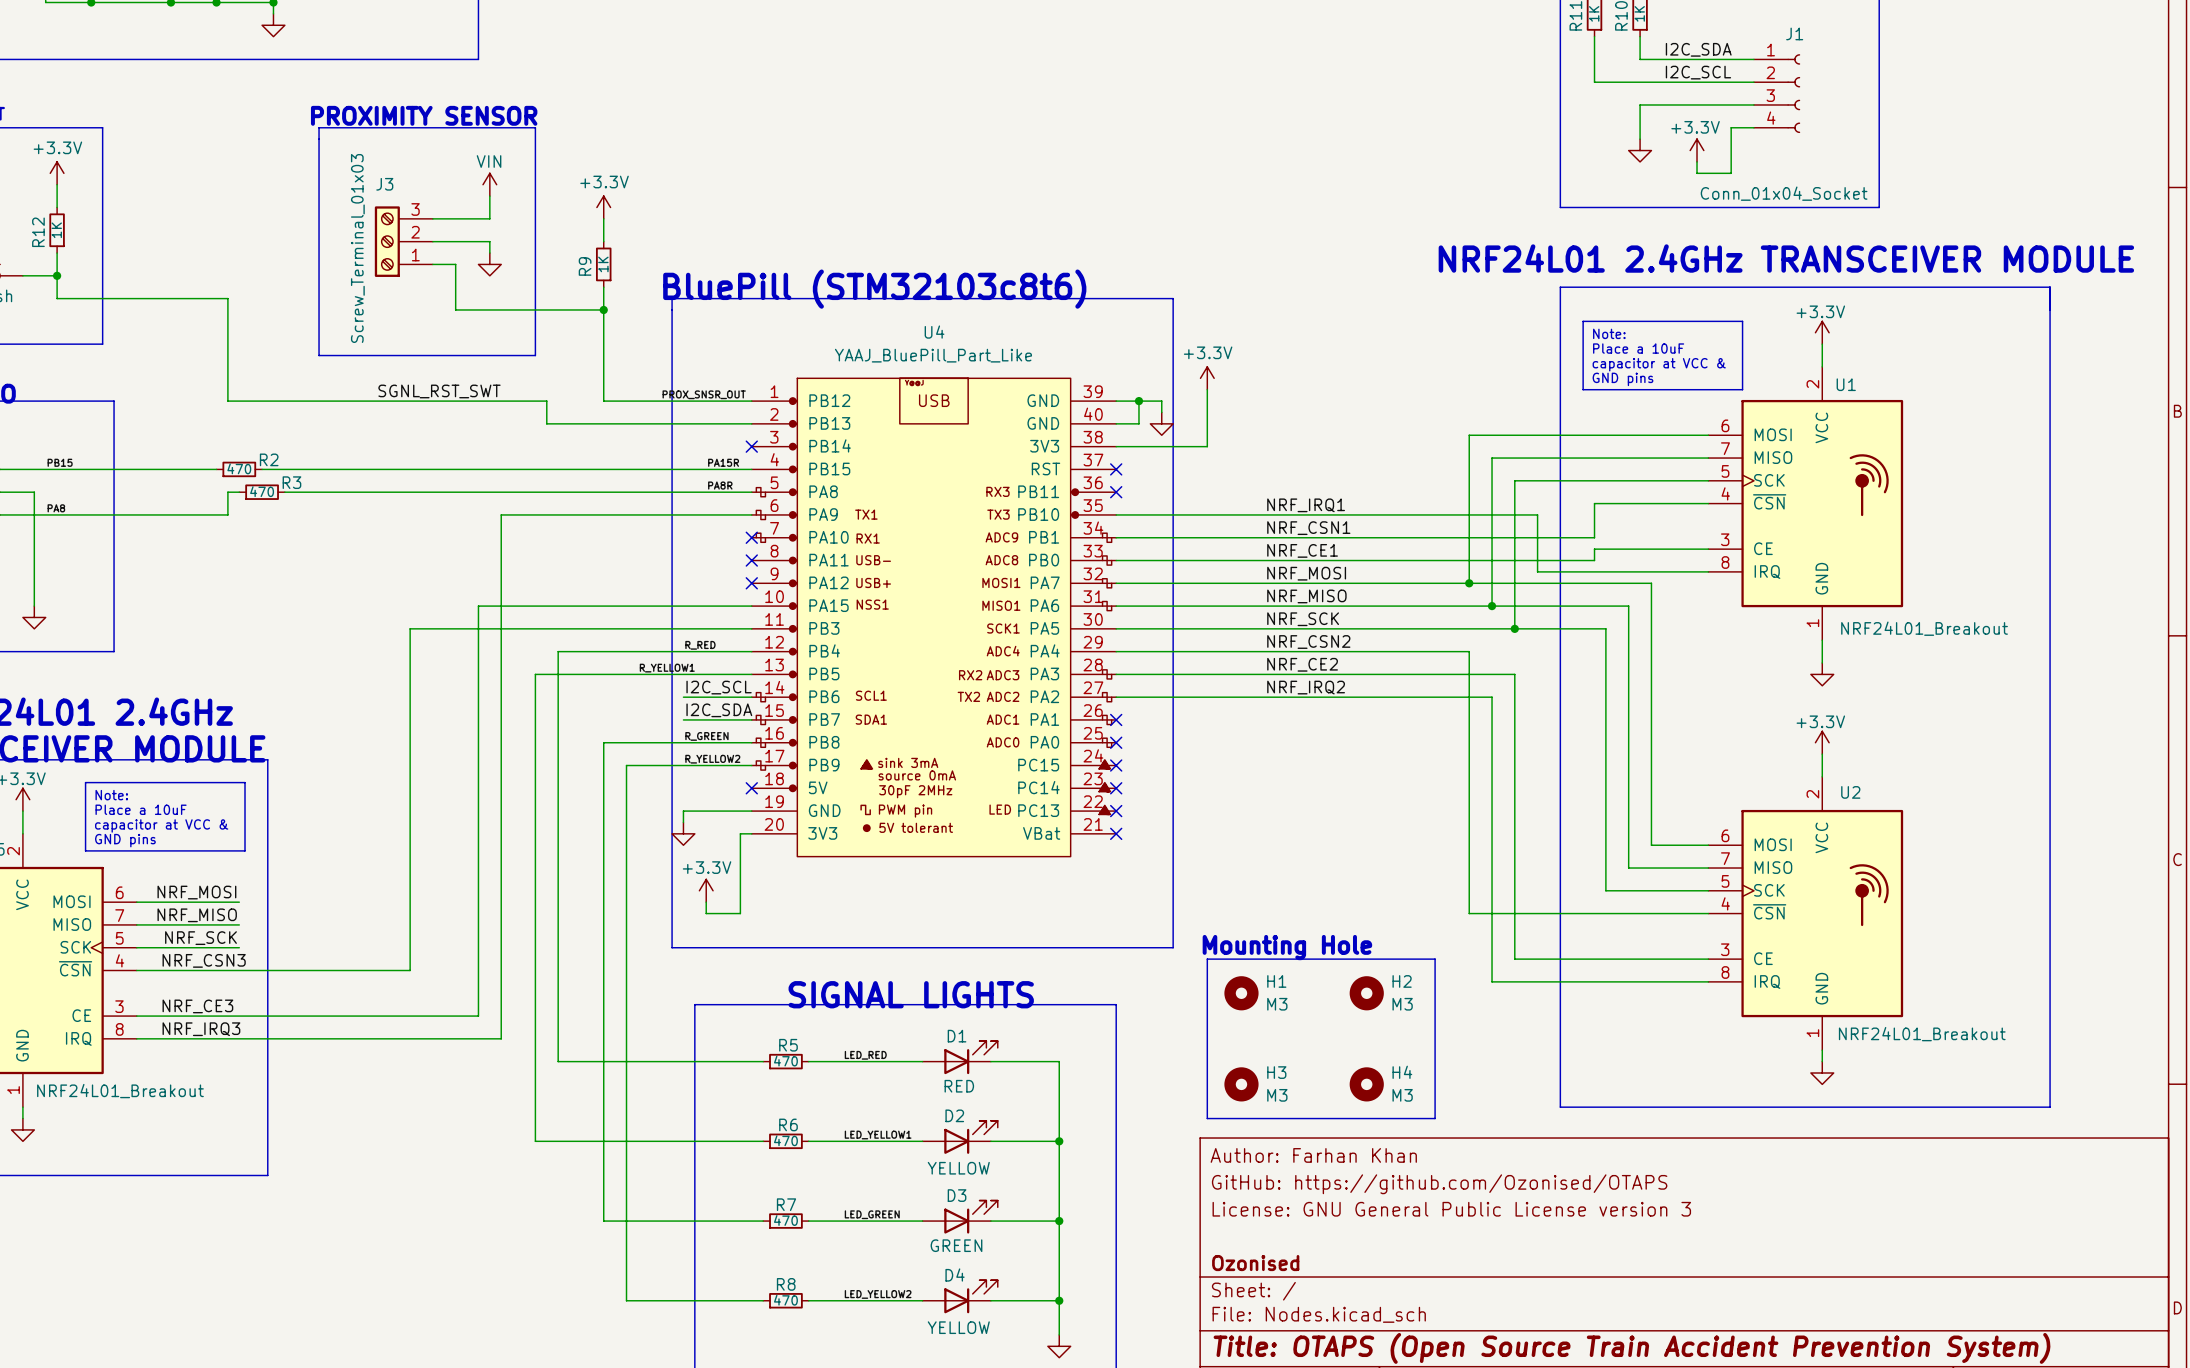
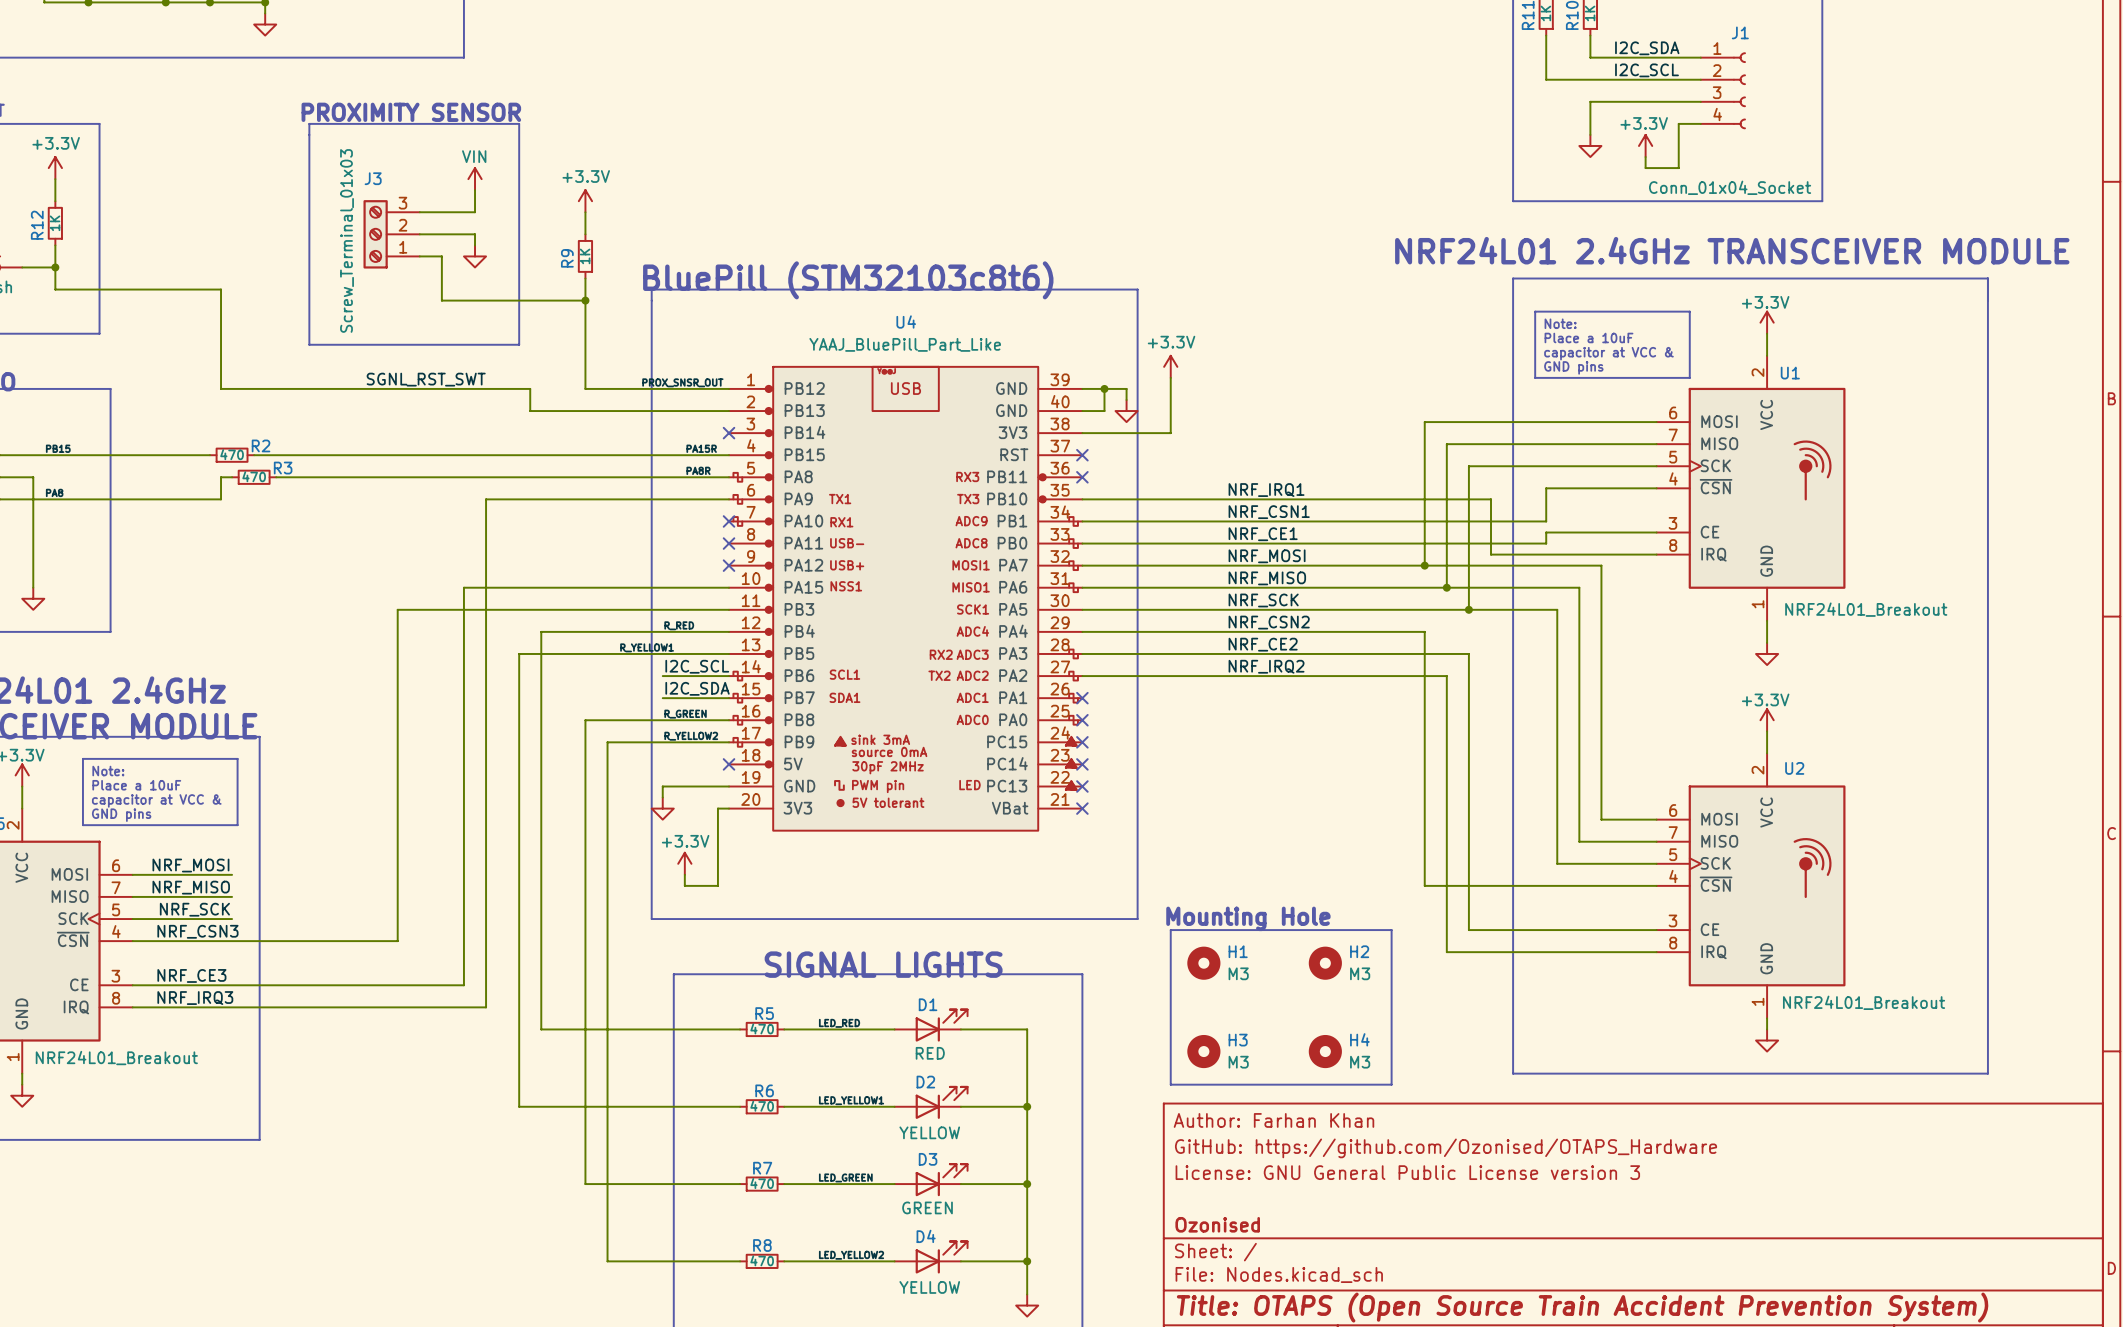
title block: GitHub: https://github.com/Ozonised/OTAPS (1439, 1184) -> GitHub: https://github.com/Ozonised/OTAPS_Hardware (1446, 1148)

